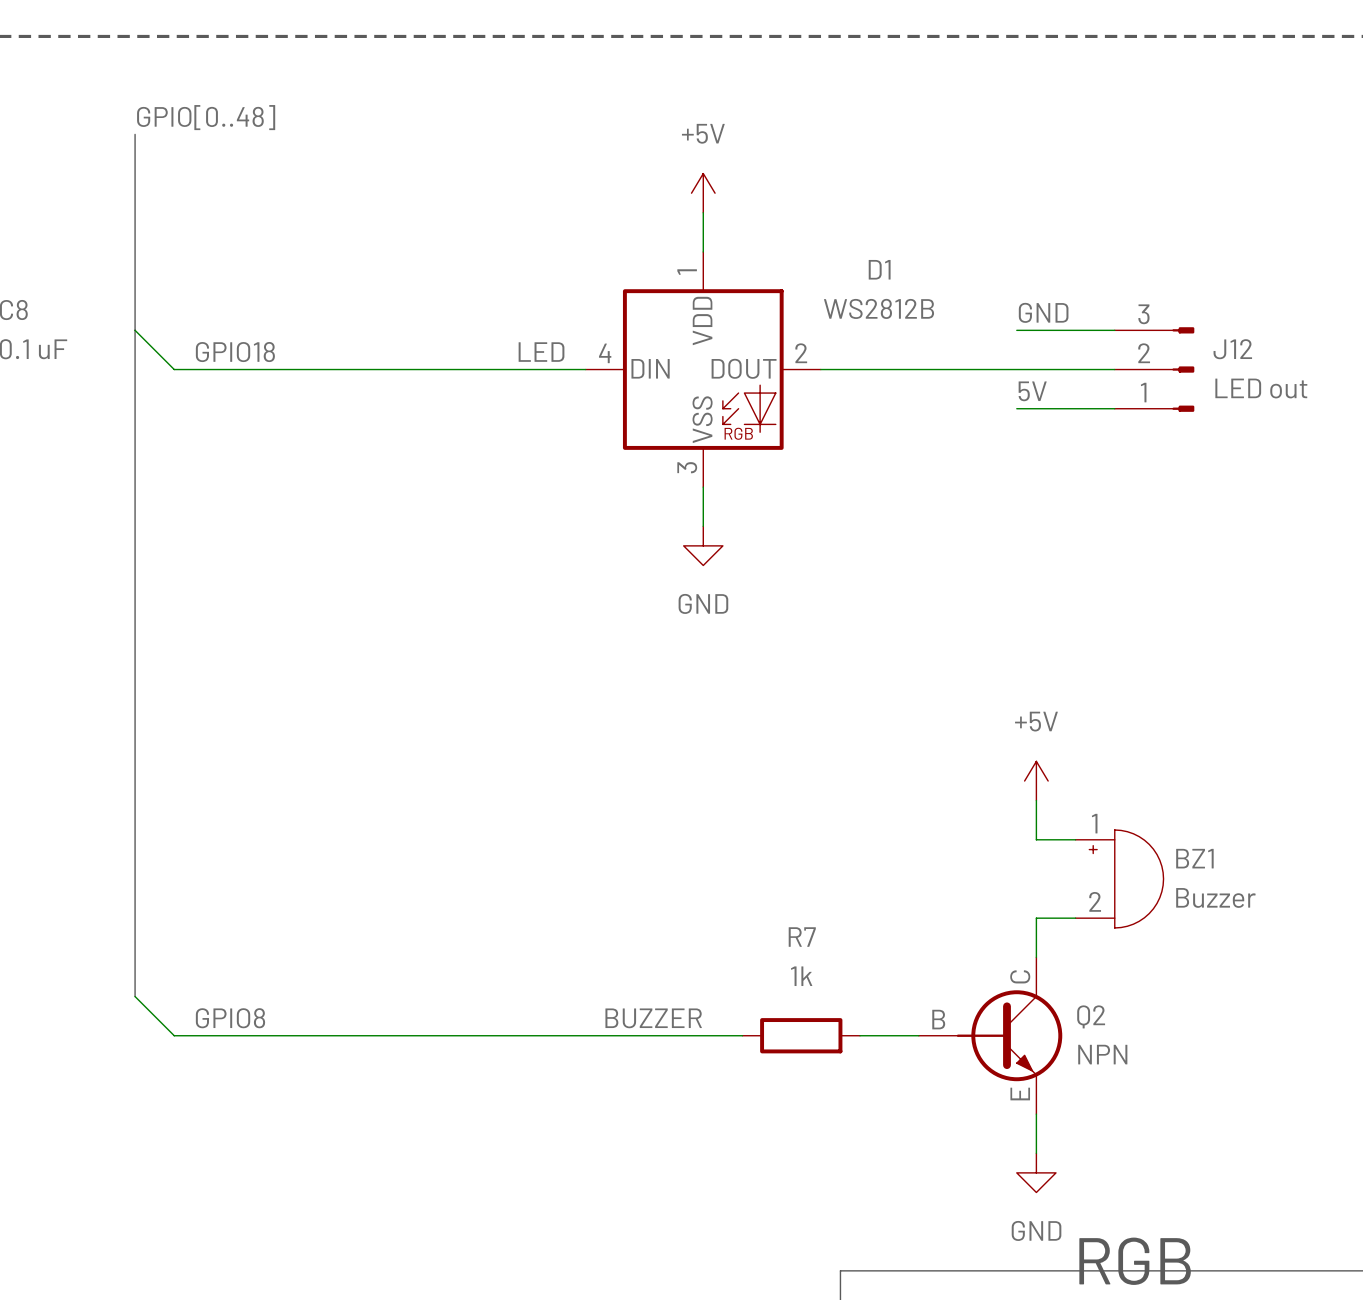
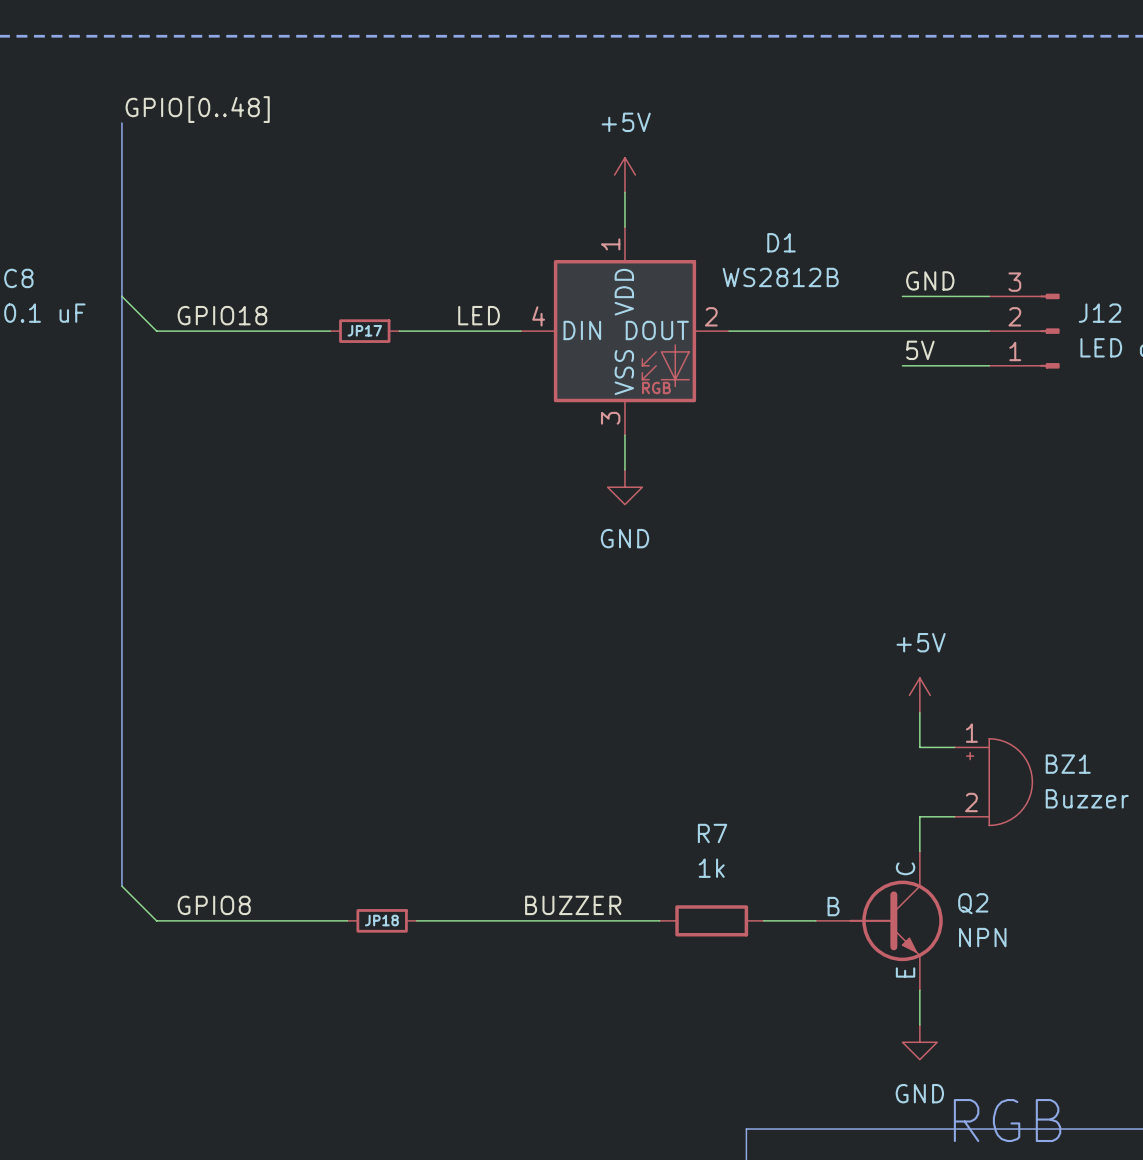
wire: (370, 369) (448, 369) -> none
JP17: none -> (364, 331)
wire: (389, 1035) (468, 1035) -> none
JP18: none -> (382, 920)

